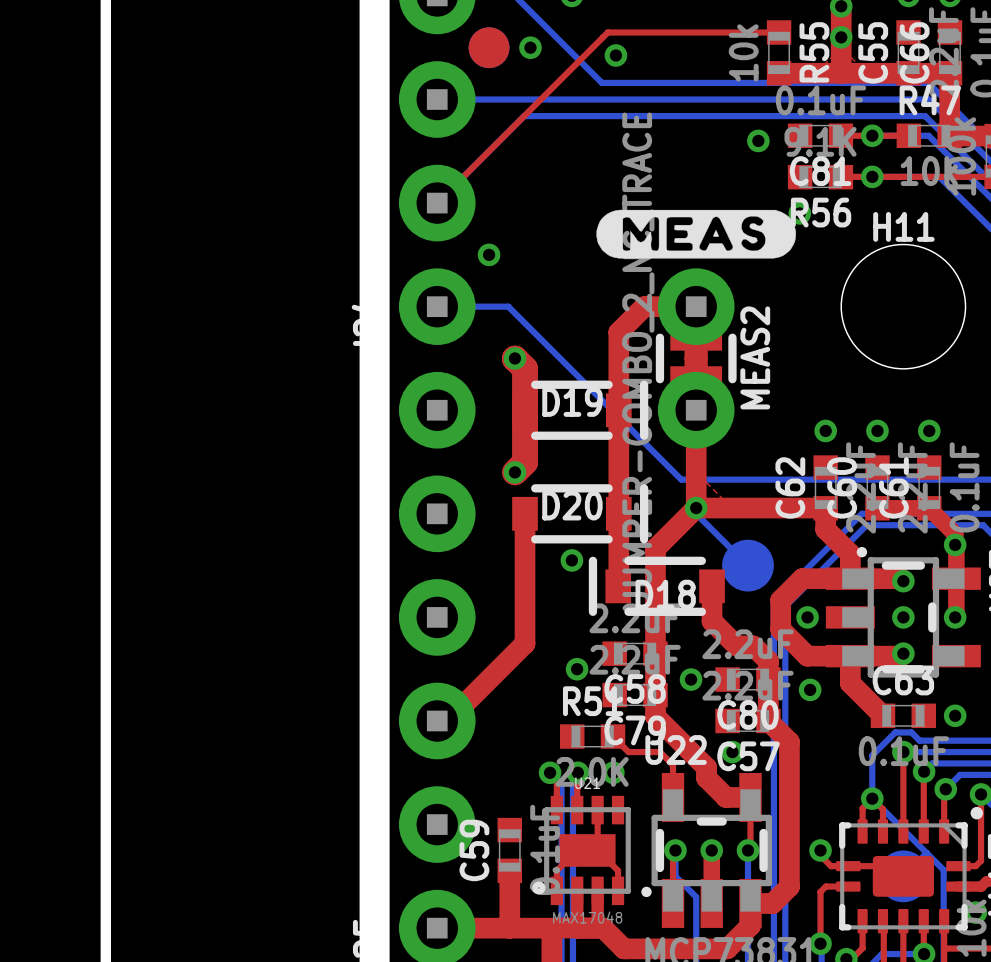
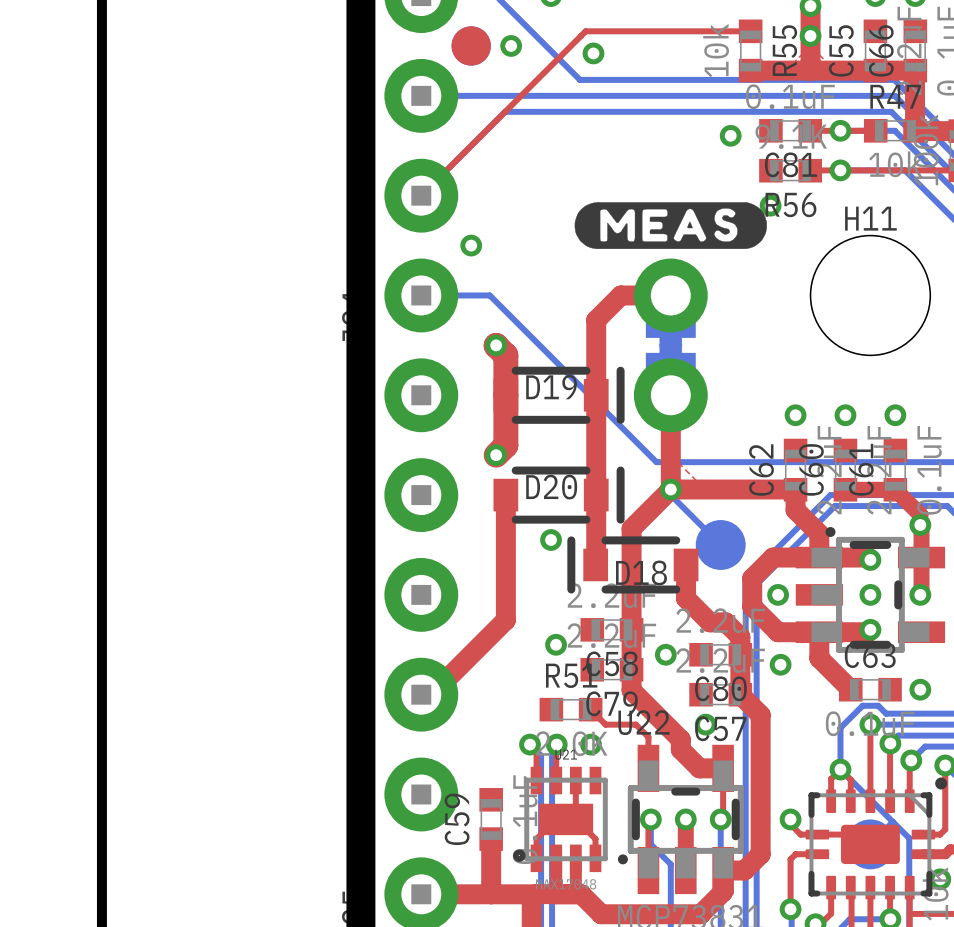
MEAS2 side: top (696, 358) -> bottom (670, 345)

